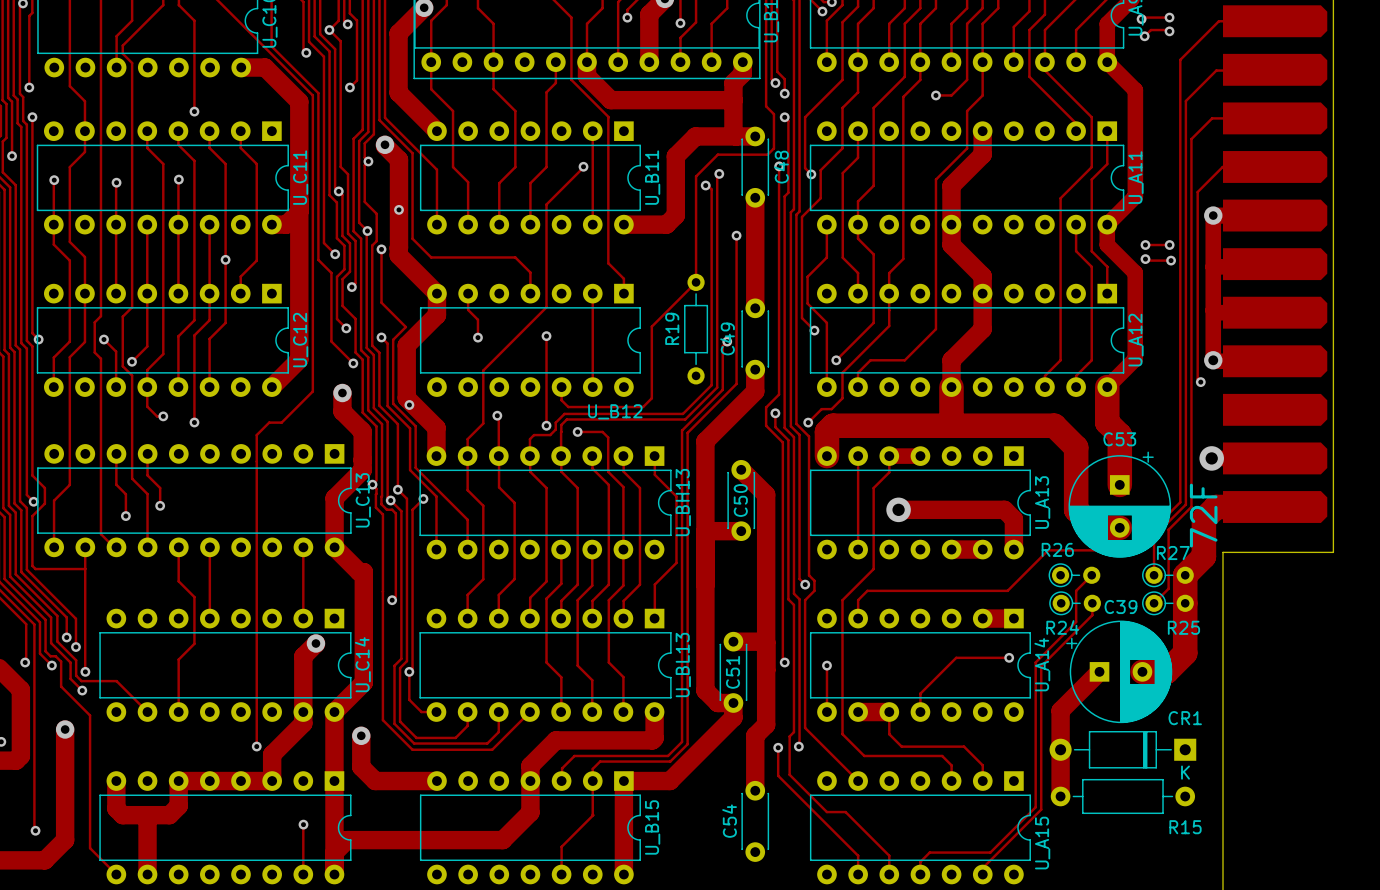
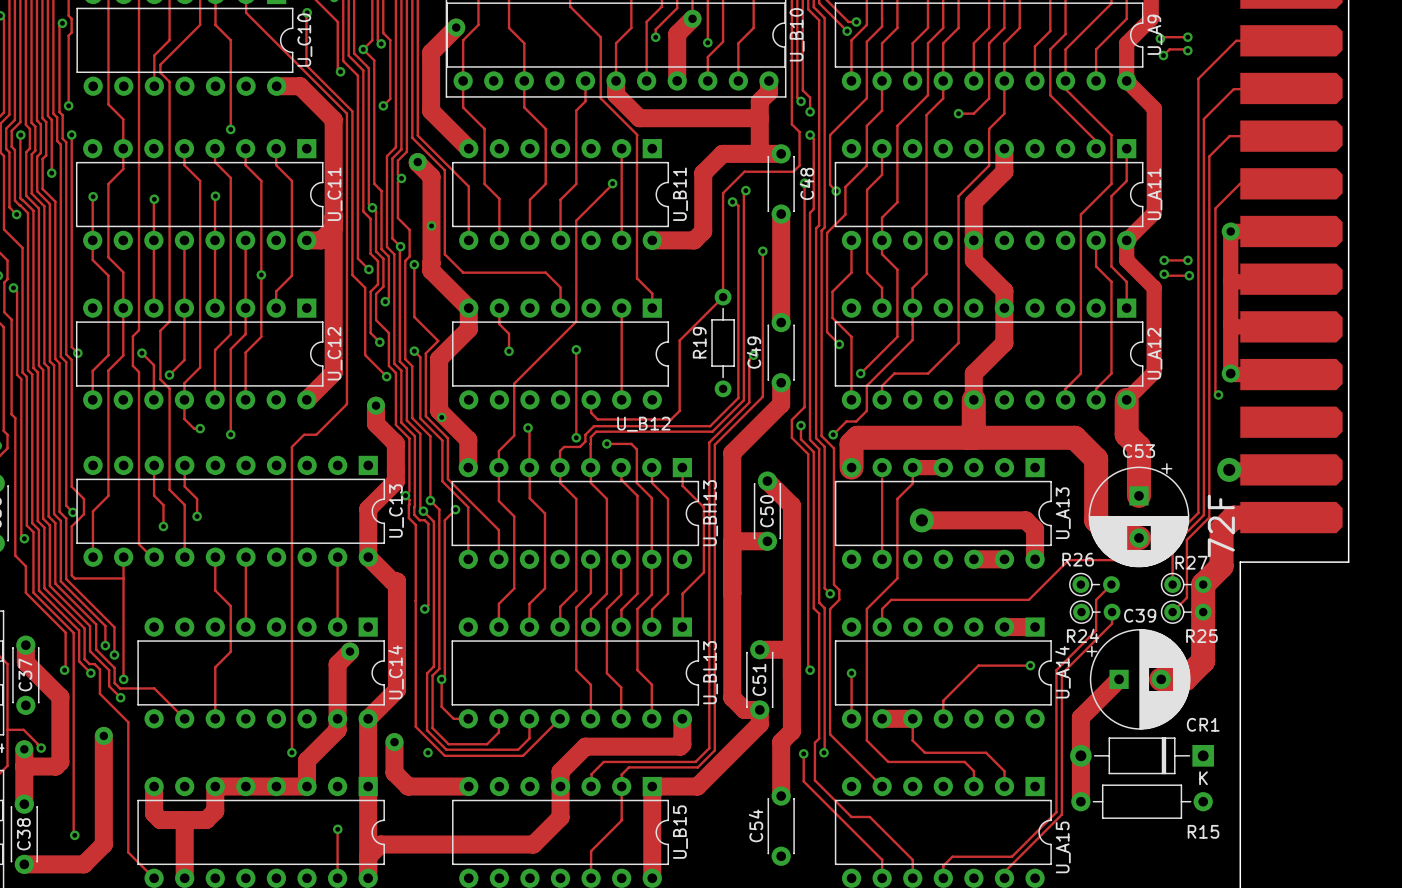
via: none -> (427, 752)

